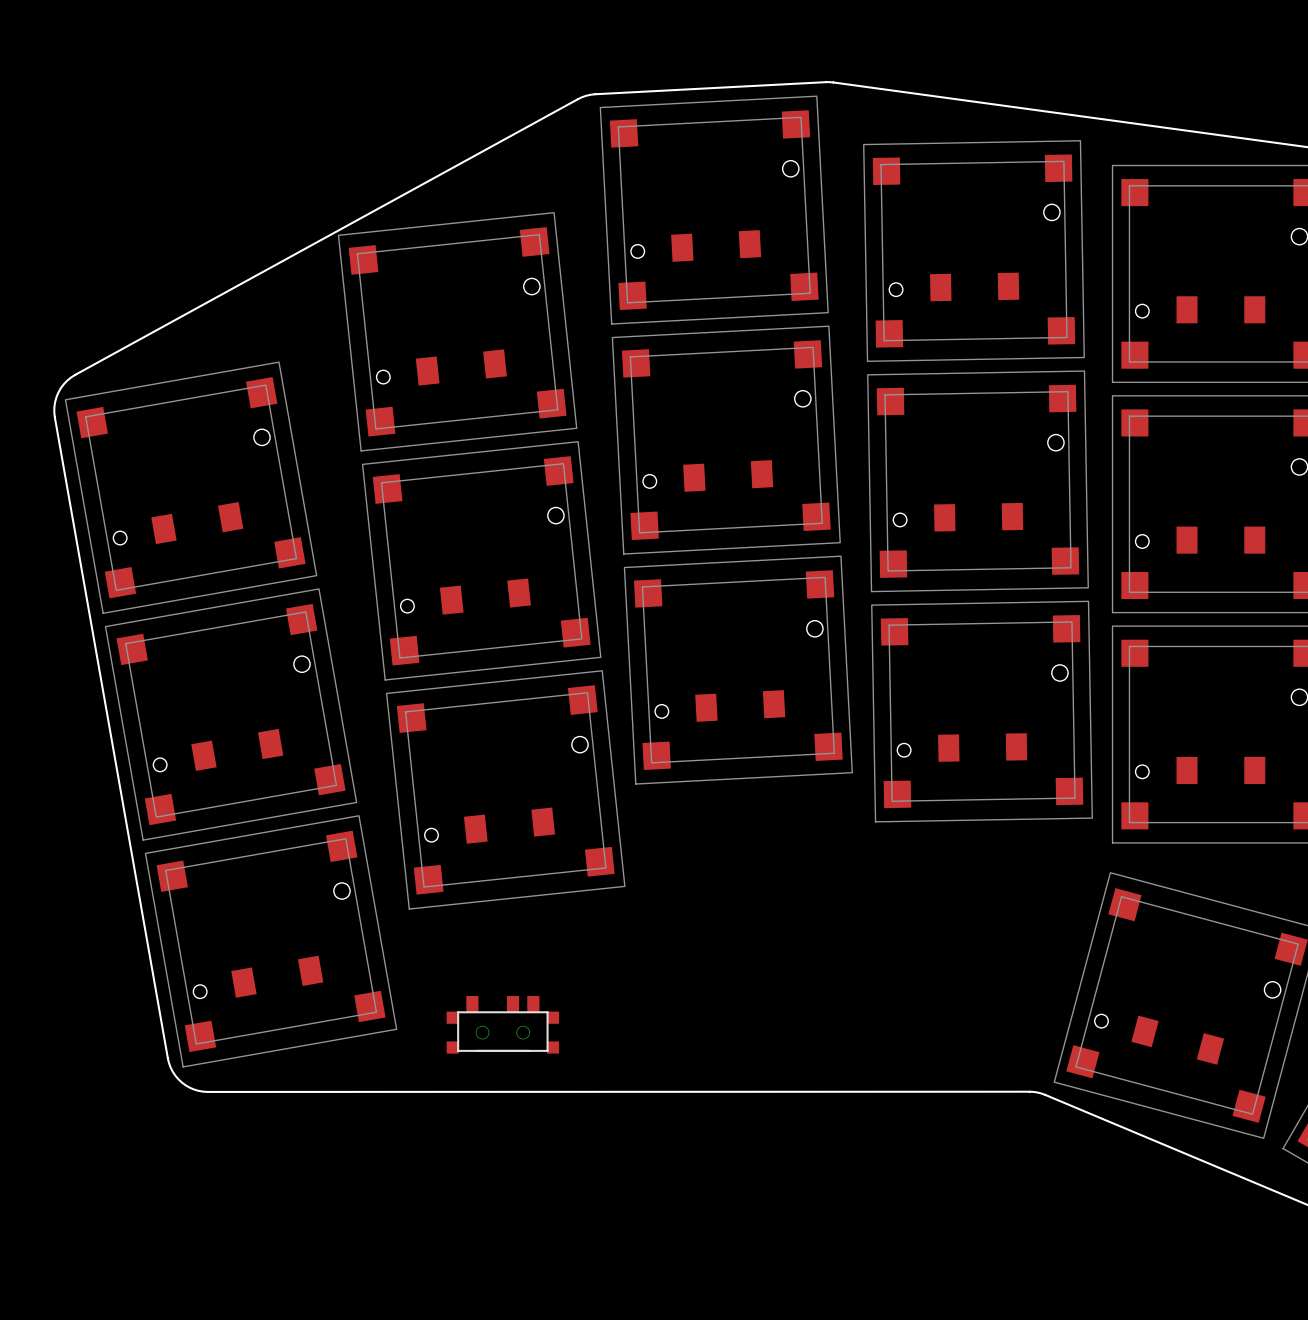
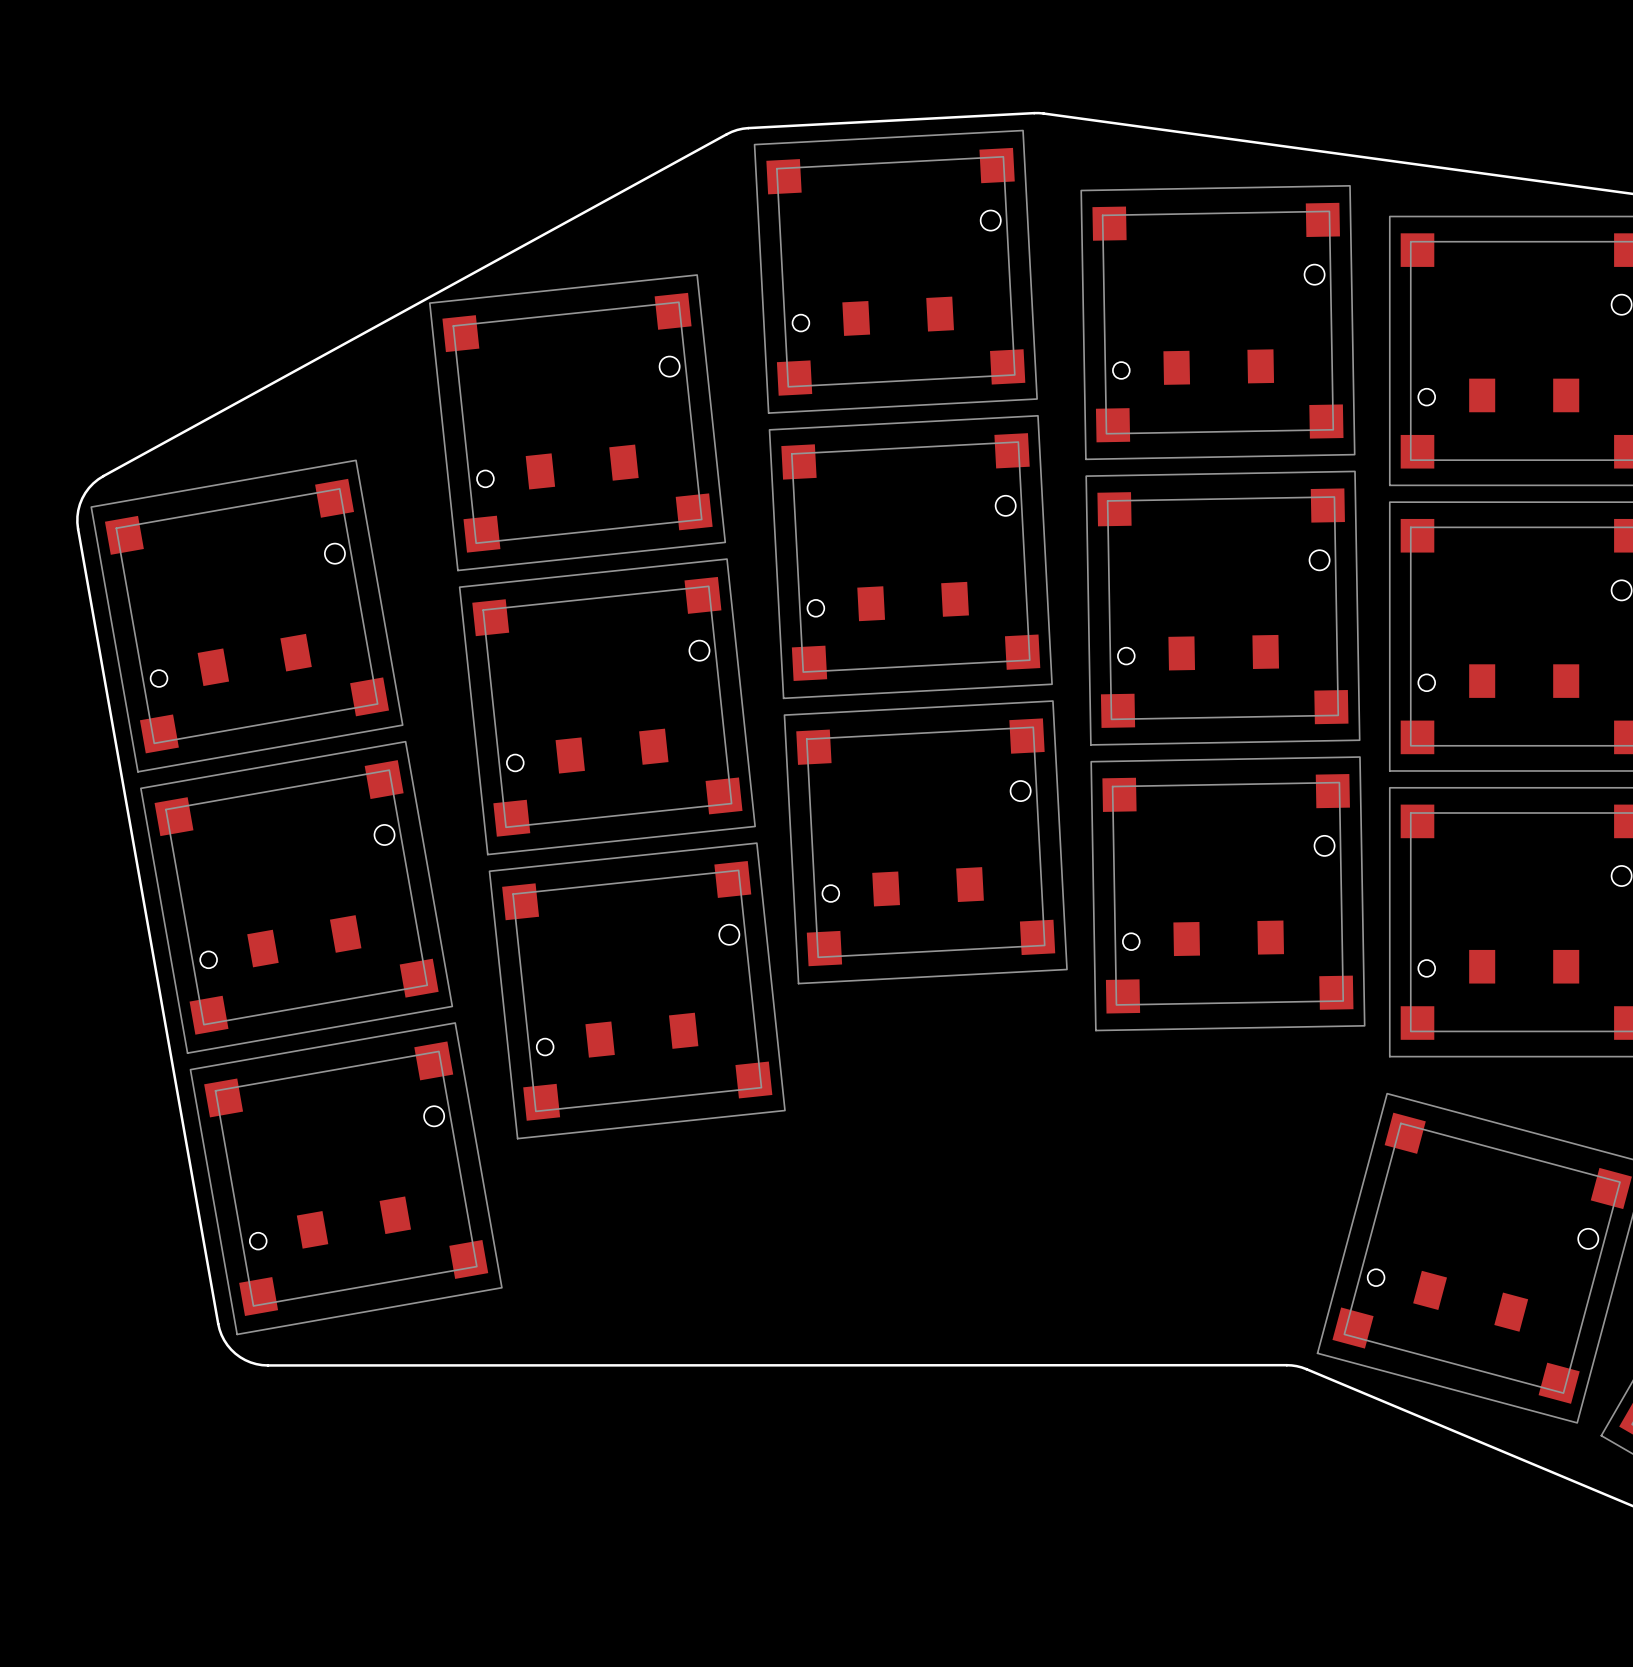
part: (502, 1024) -> none

